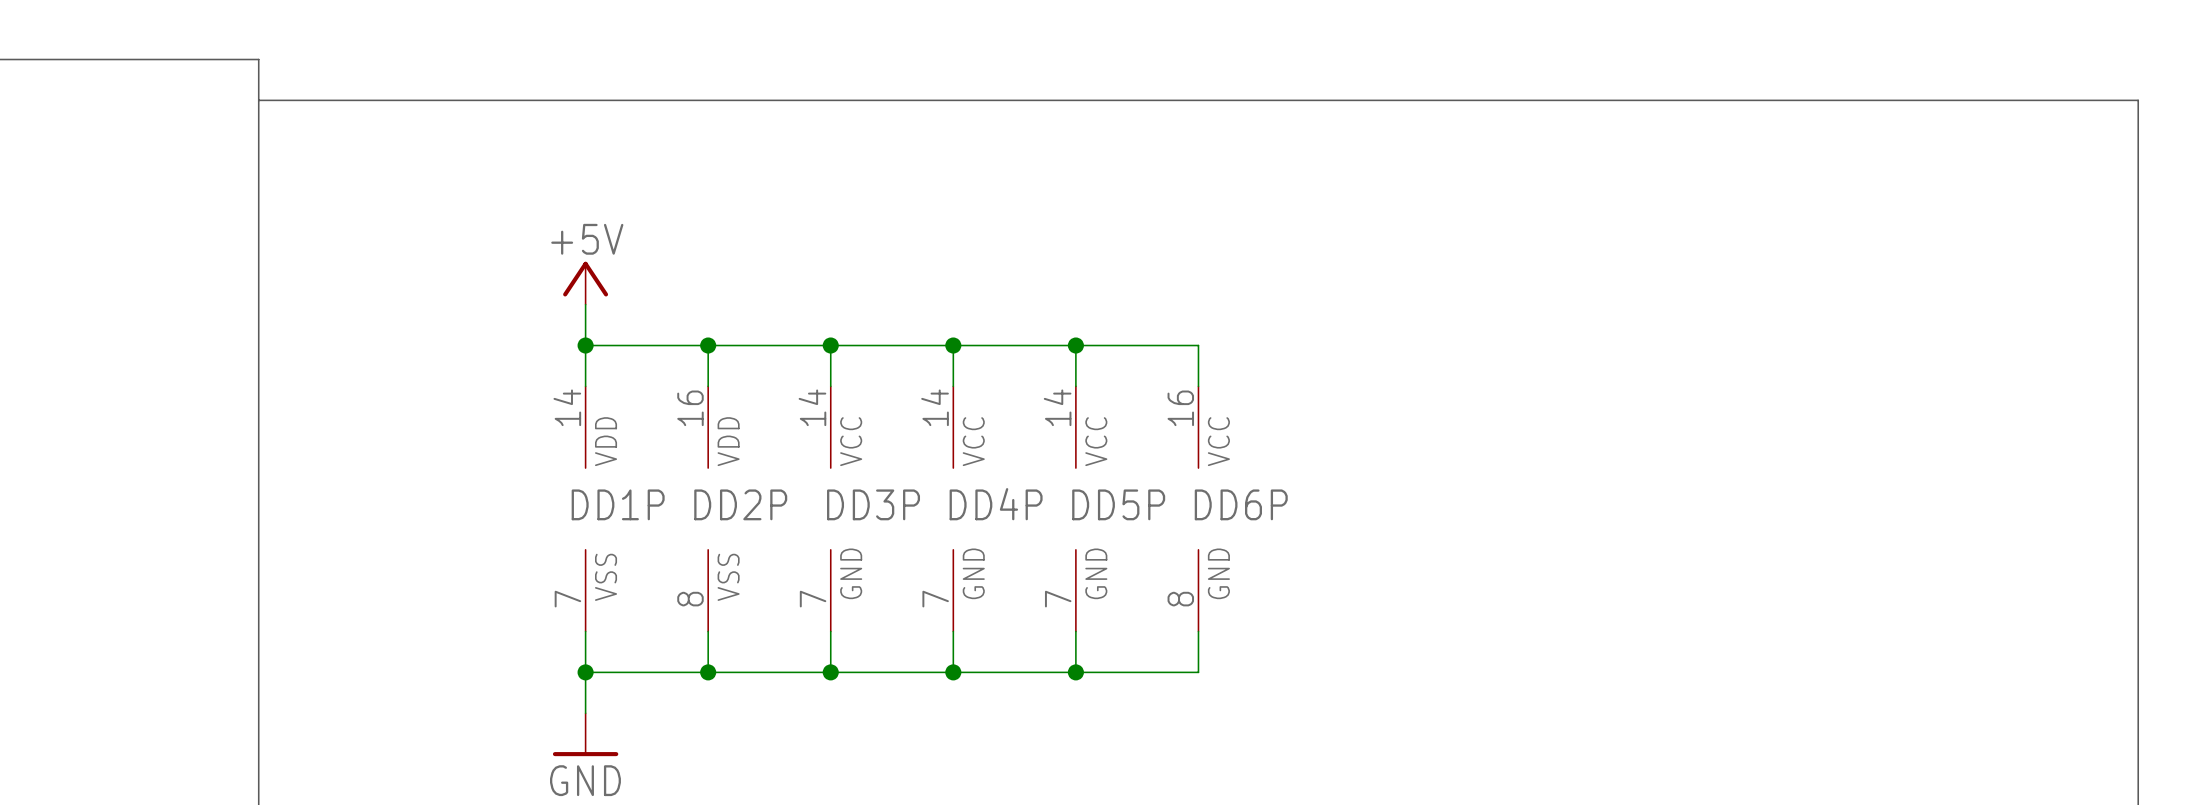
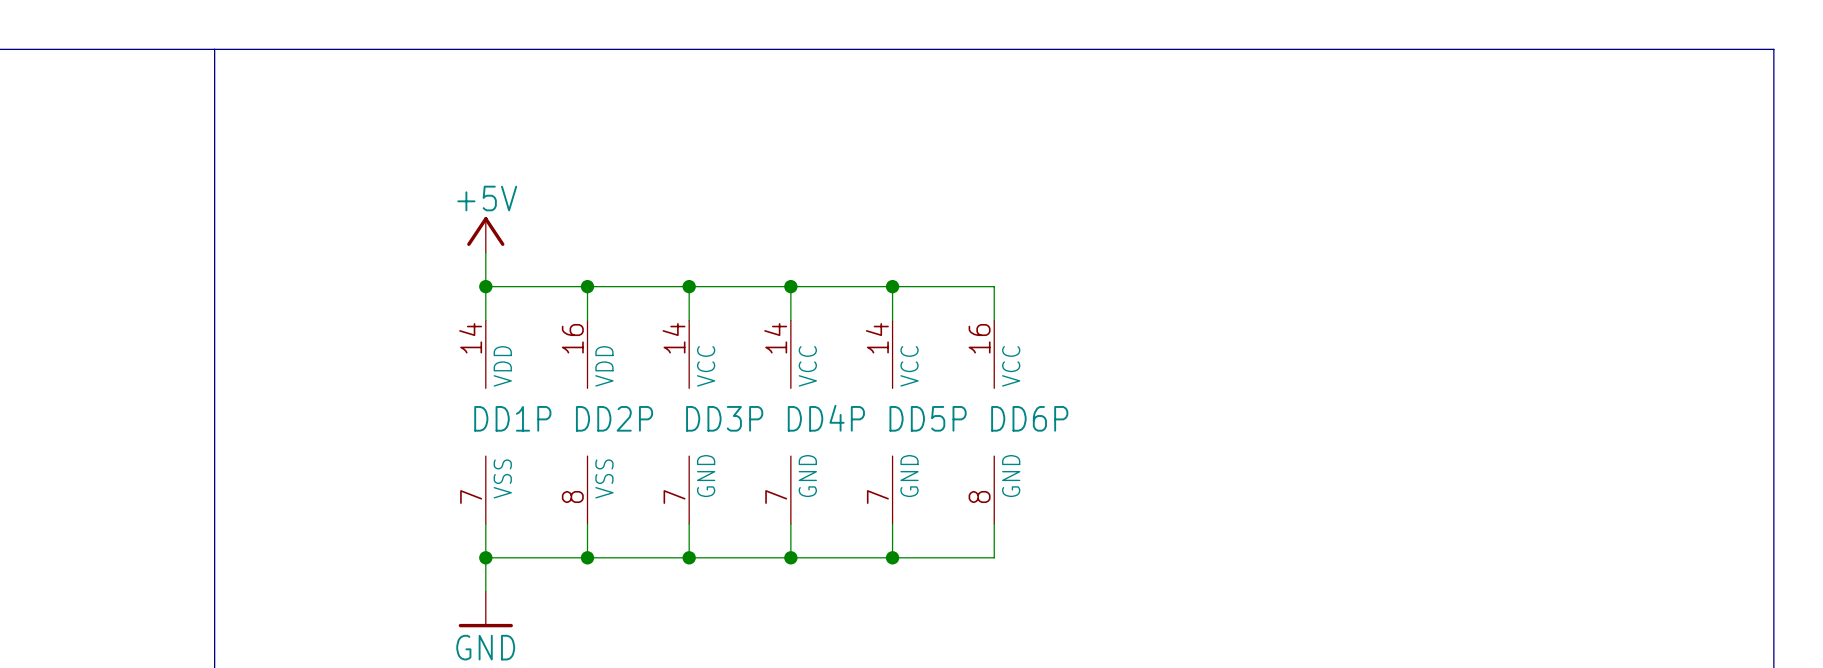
bus: (258, 100) (2138, 100) -> (214, 49) (1773, 49) (1773, 83)

